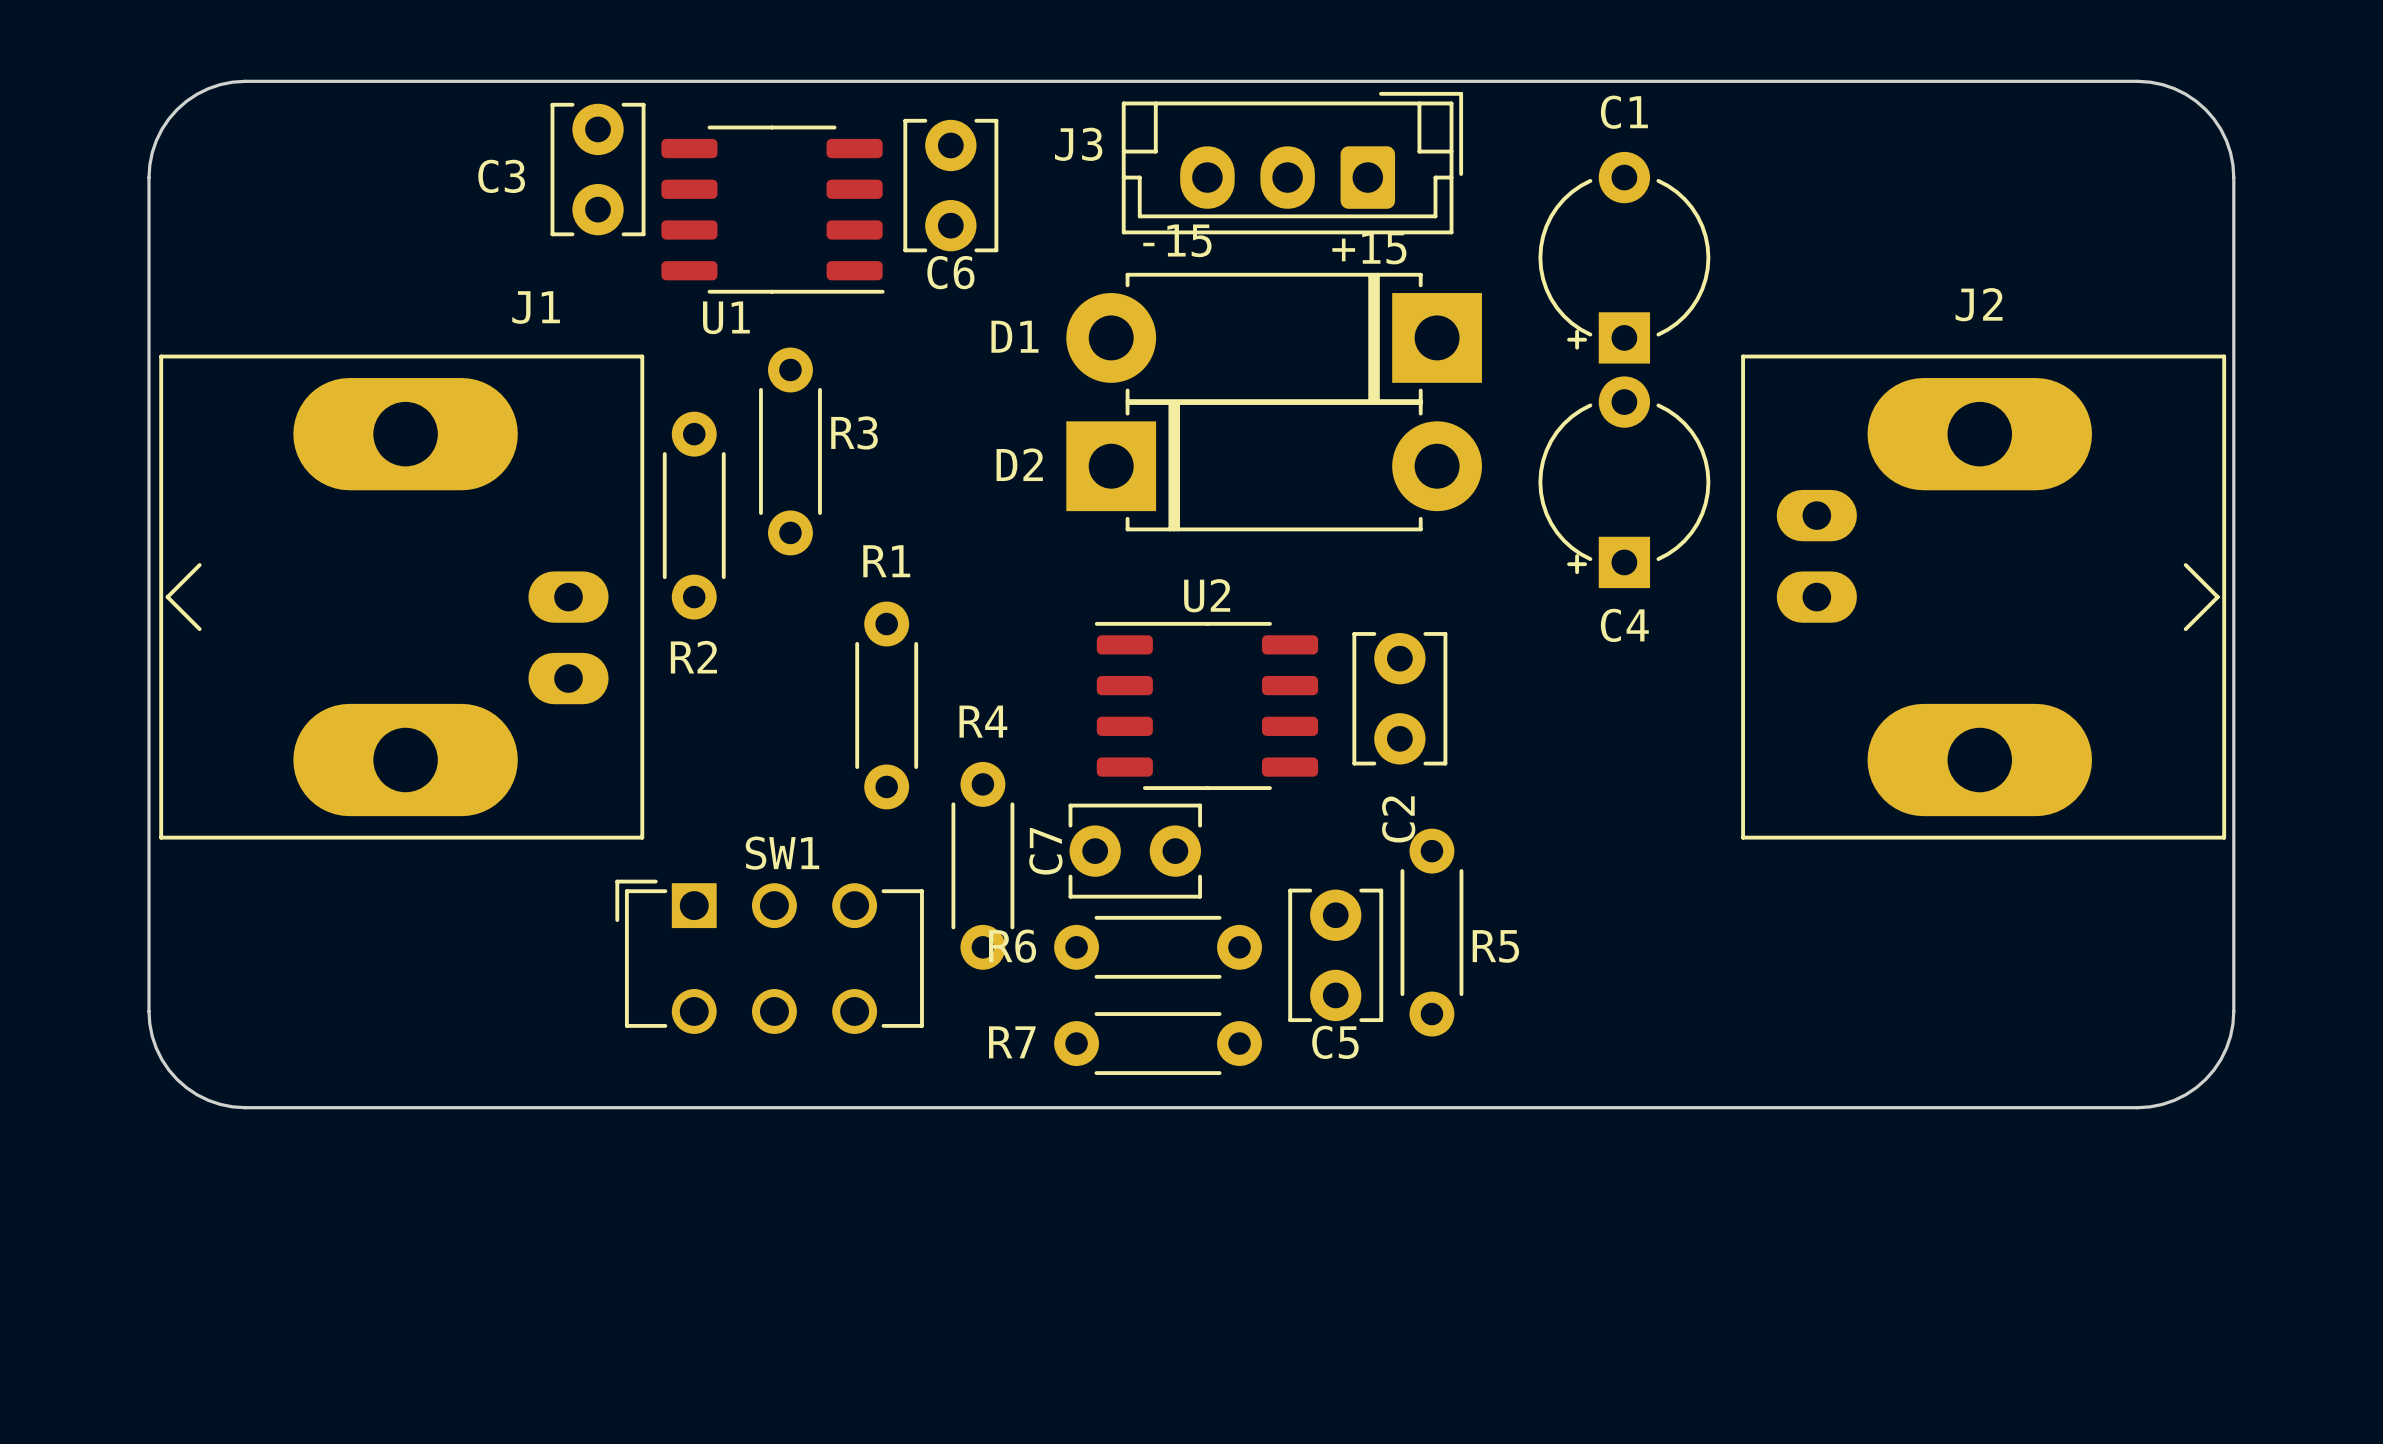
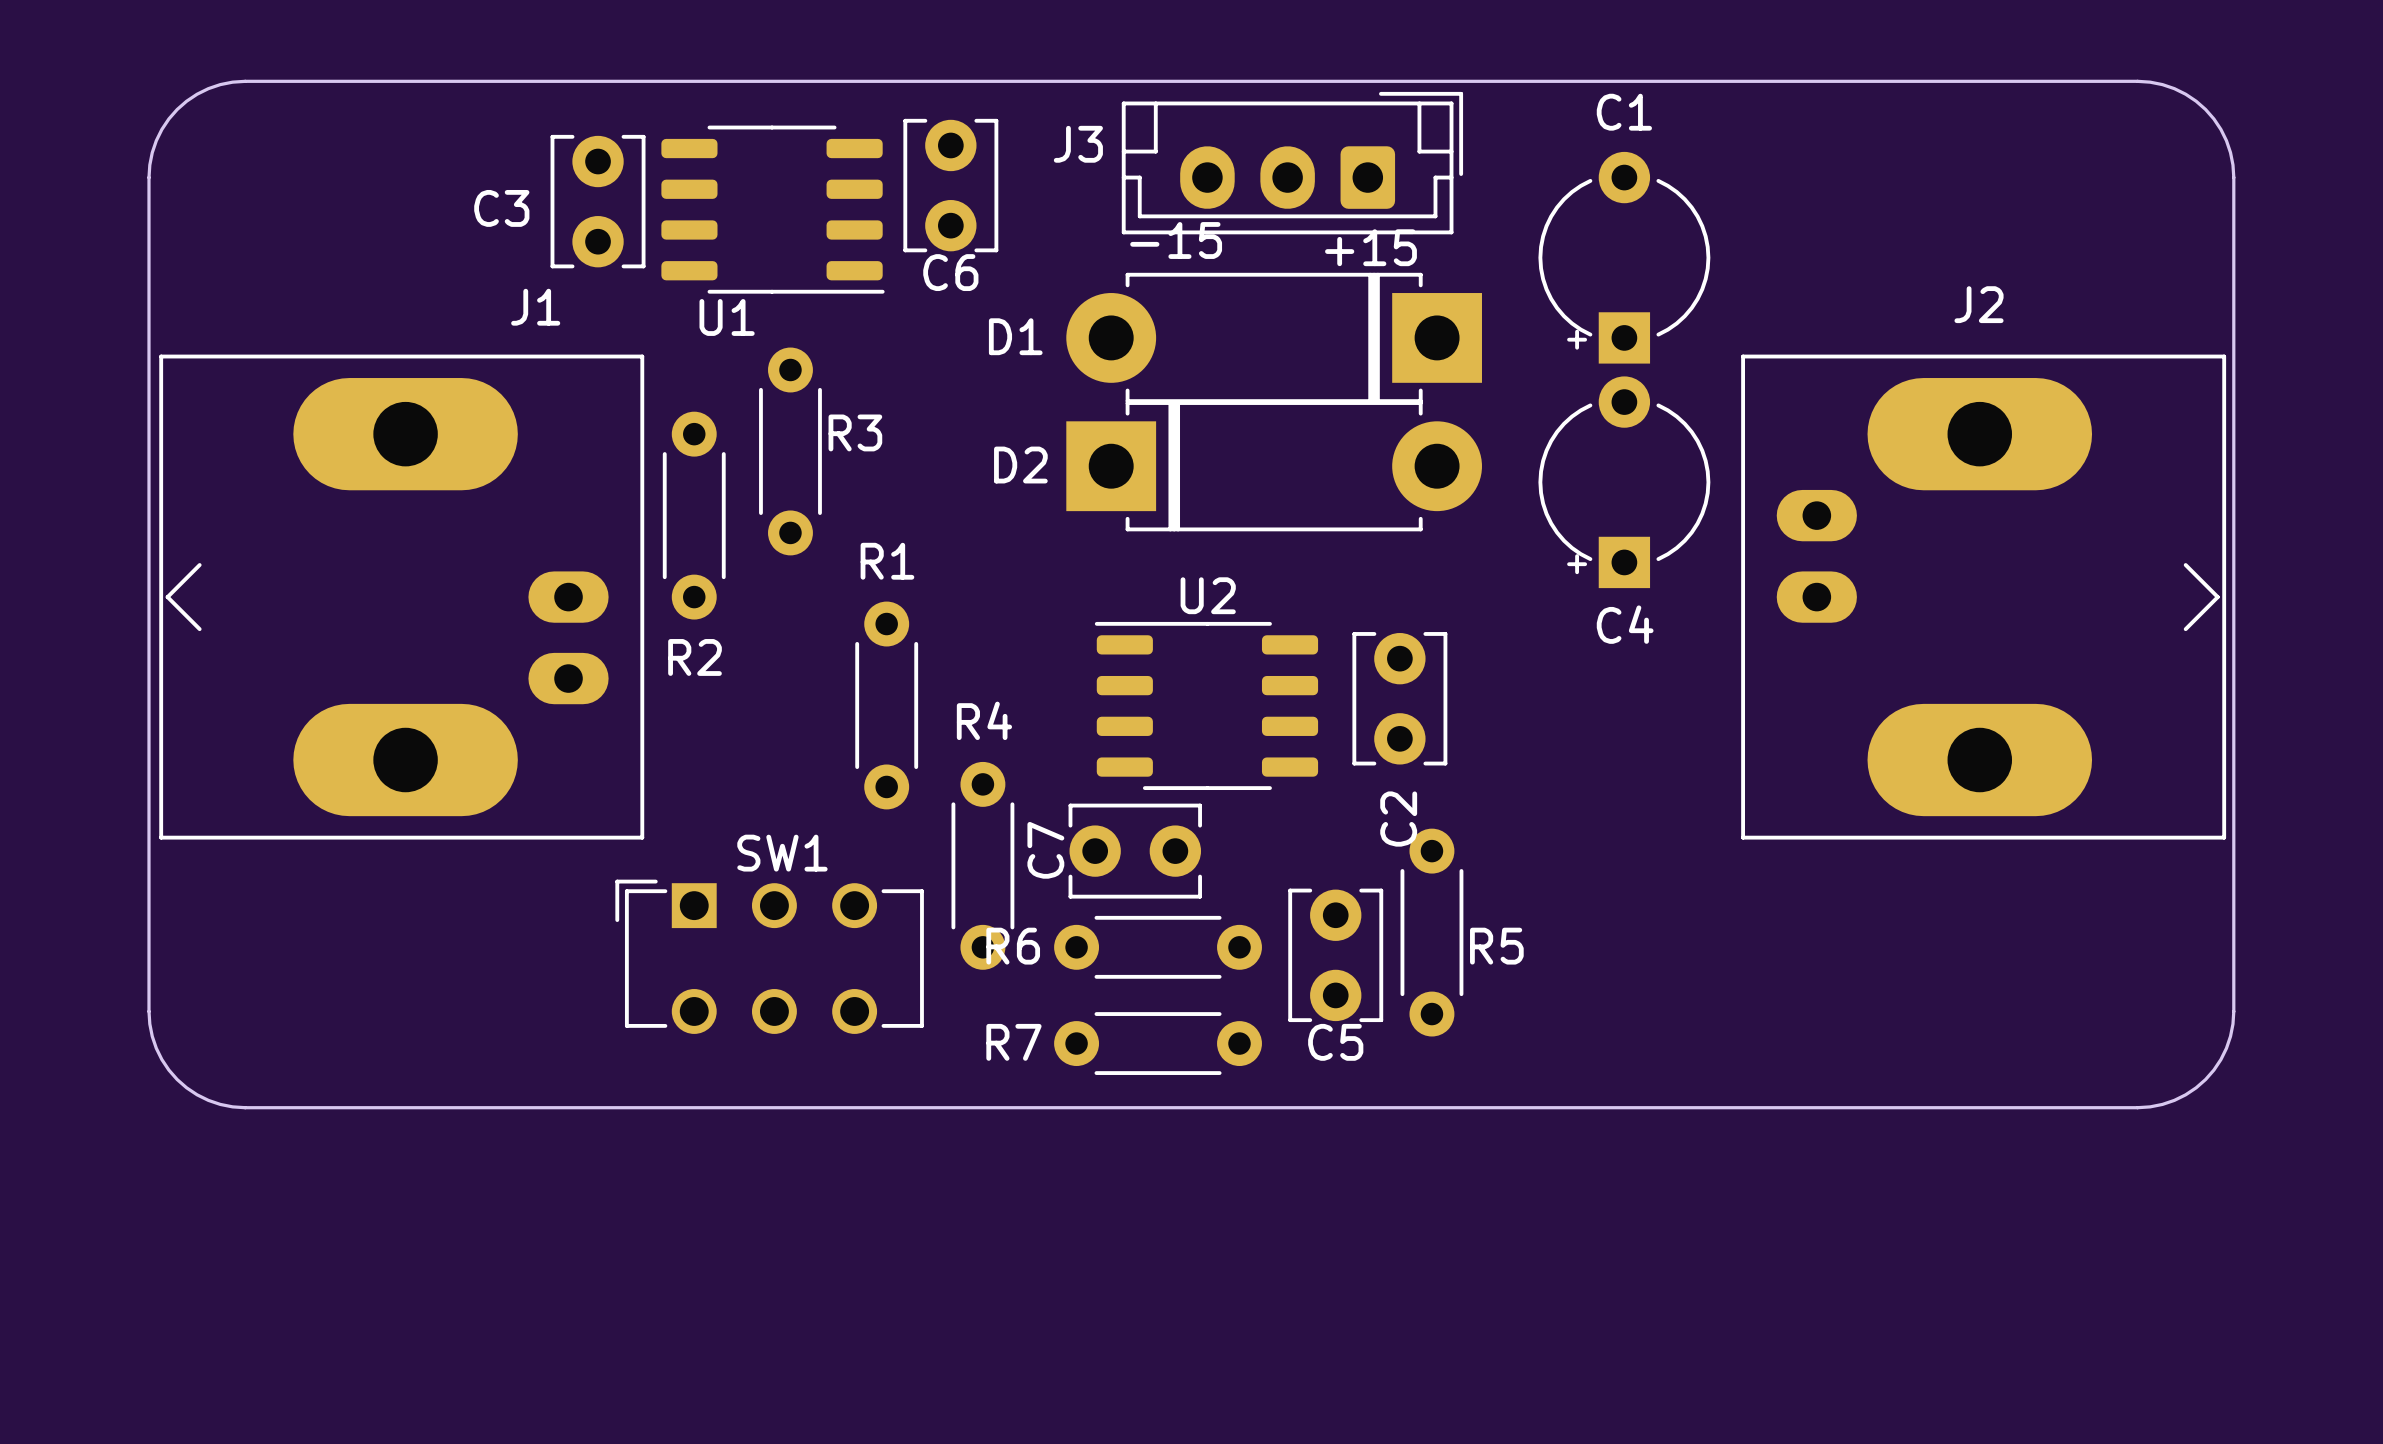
C3 position: (598, 169) -> (598, 201)

